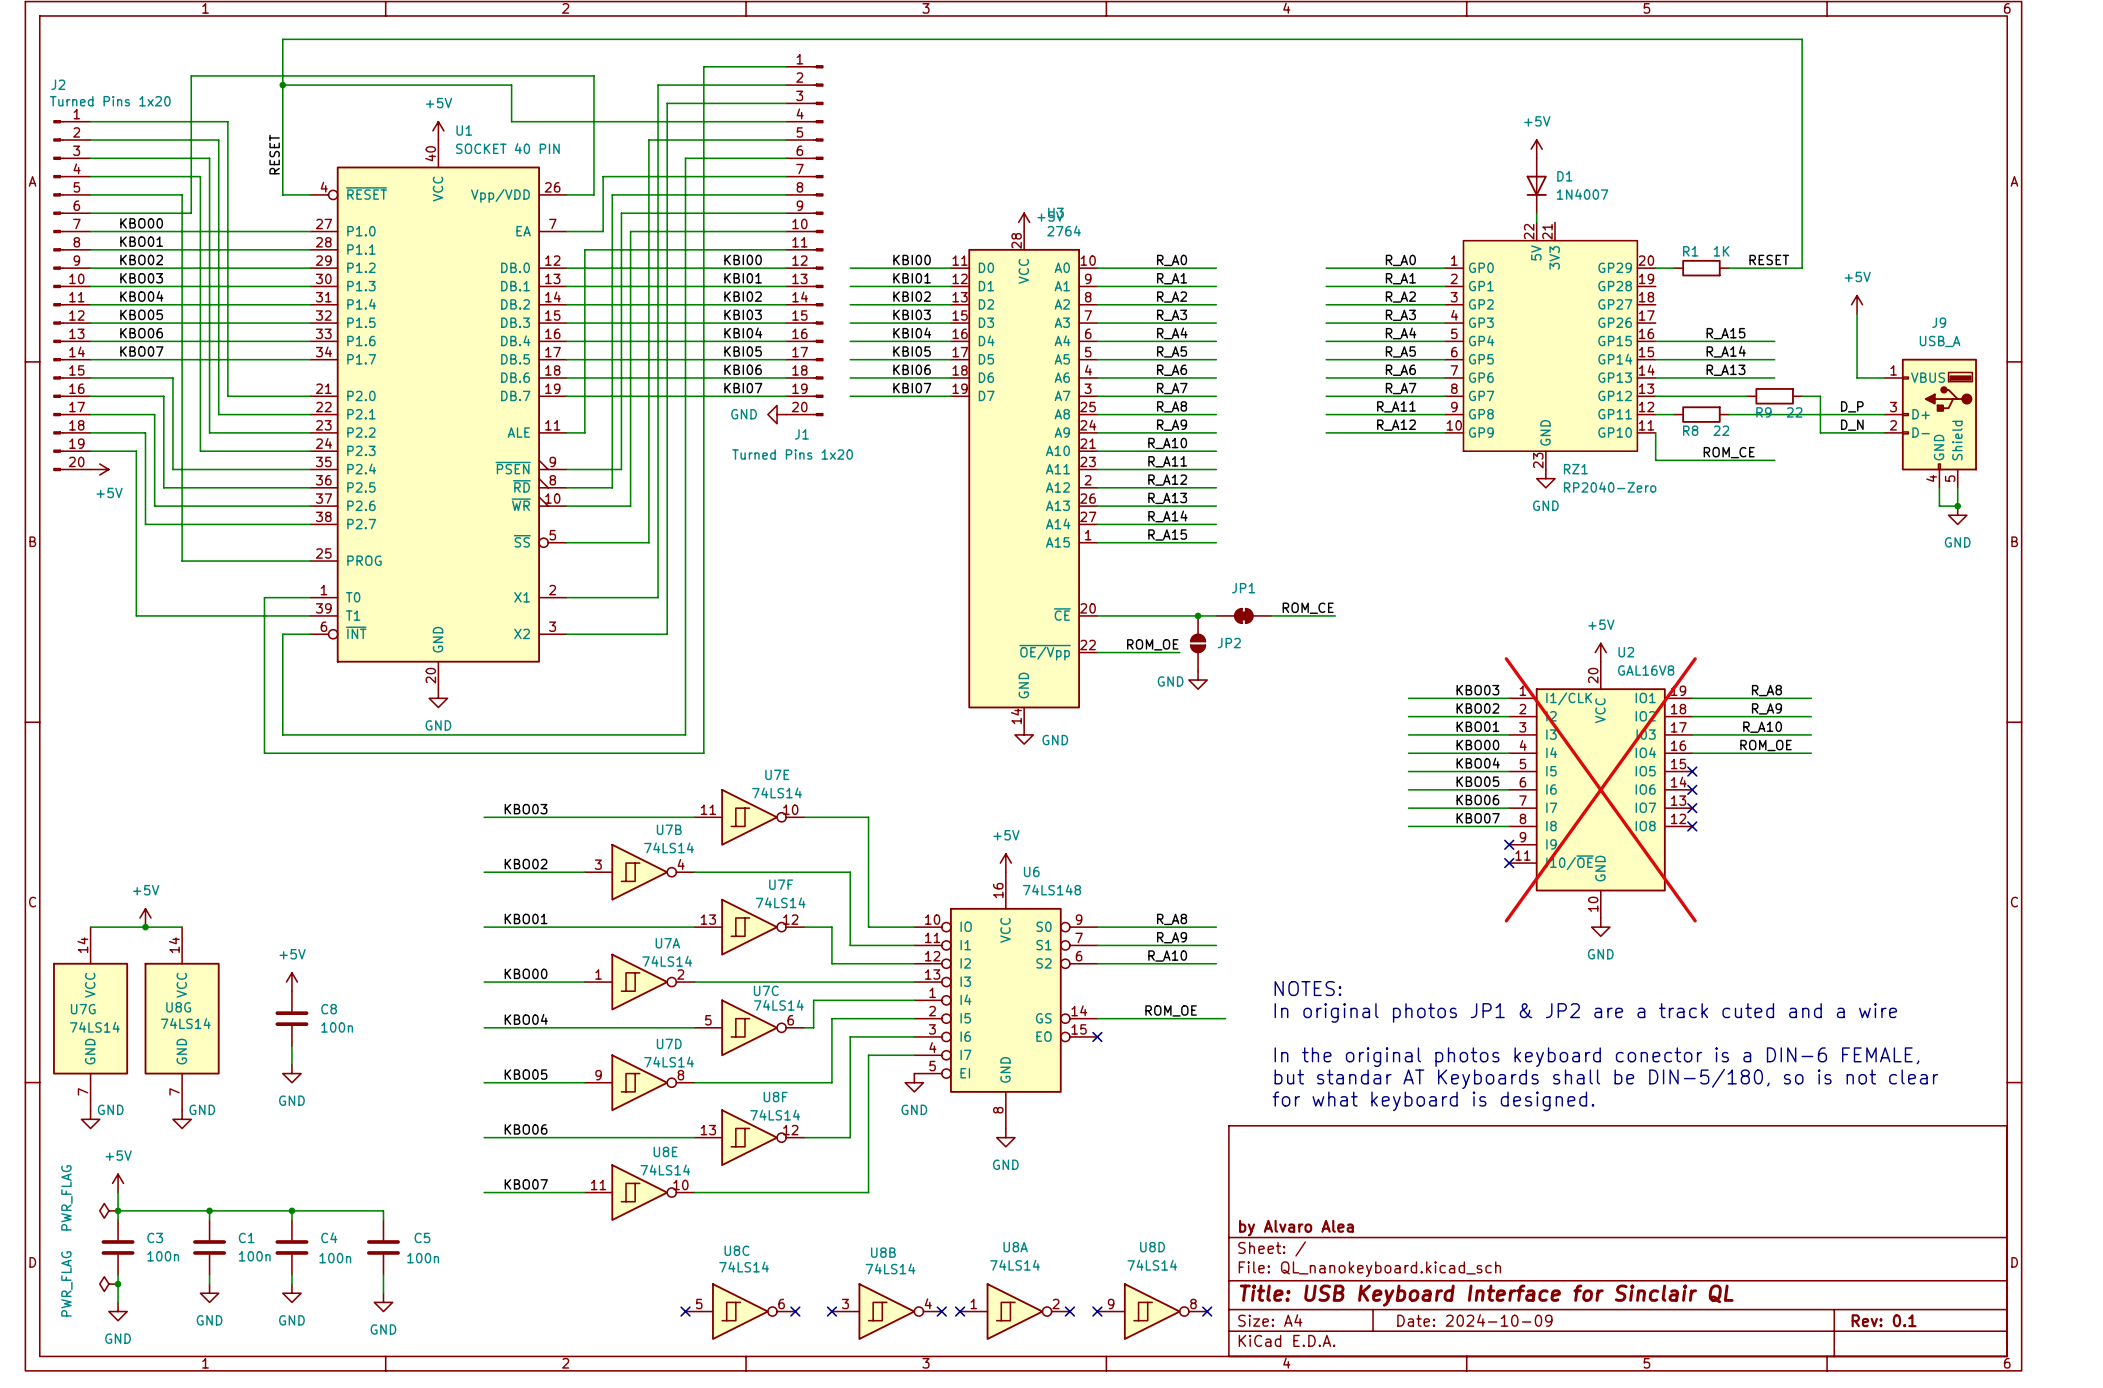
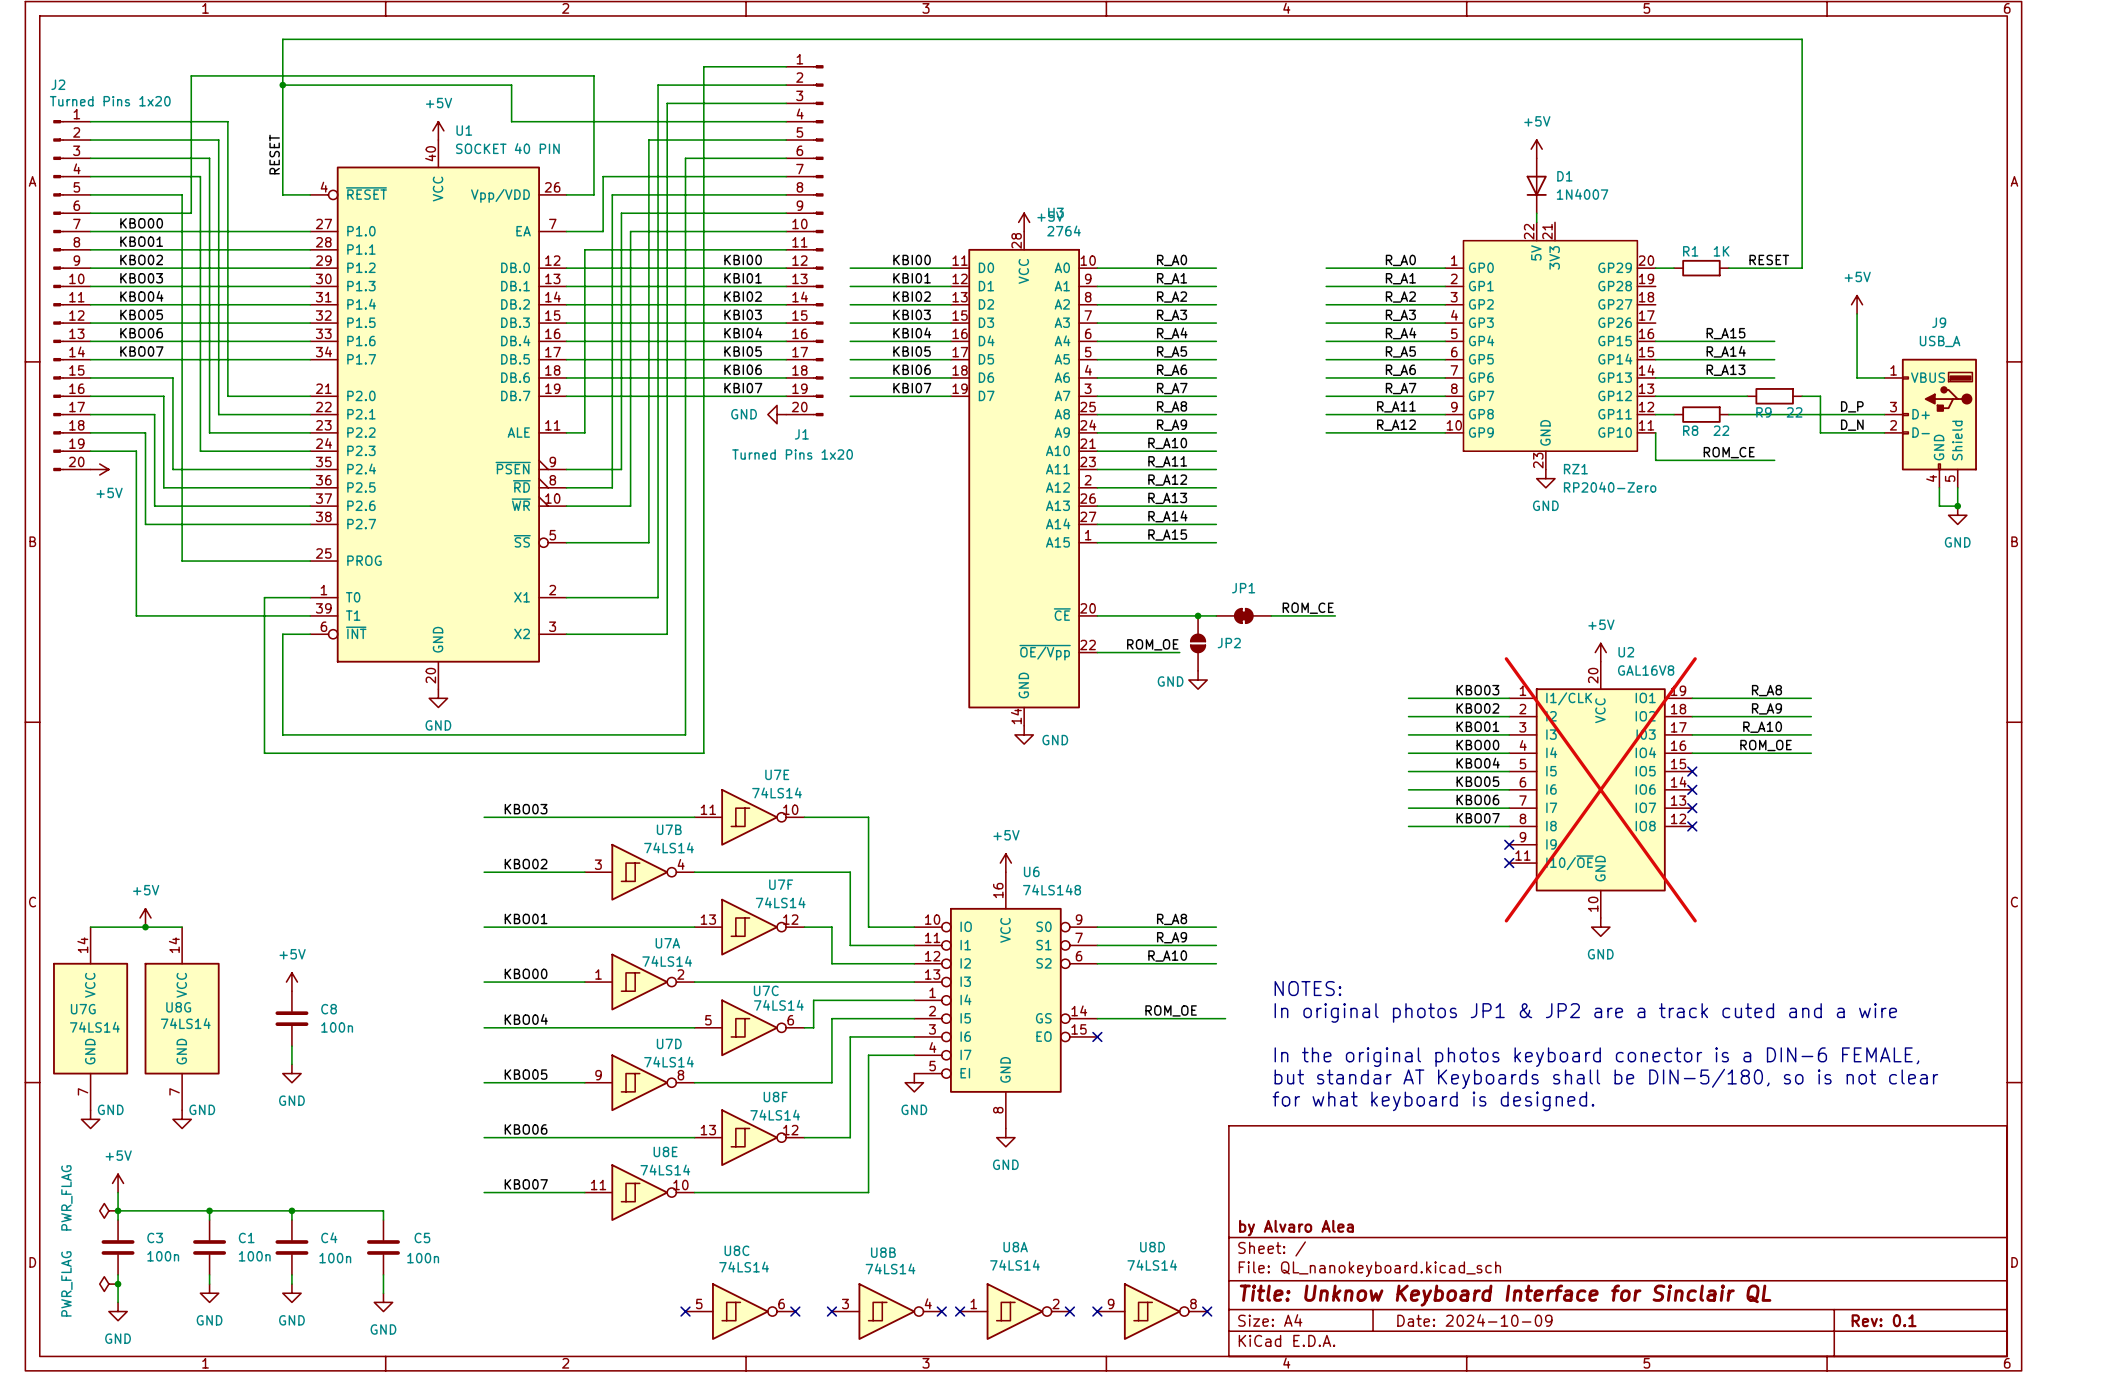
title block: Title: USB Keyboard Interface for Sinclair QL (1486, 1295) -> Title: Unknow Keyboard Interface for Sinclair QL (1505, 1295)

